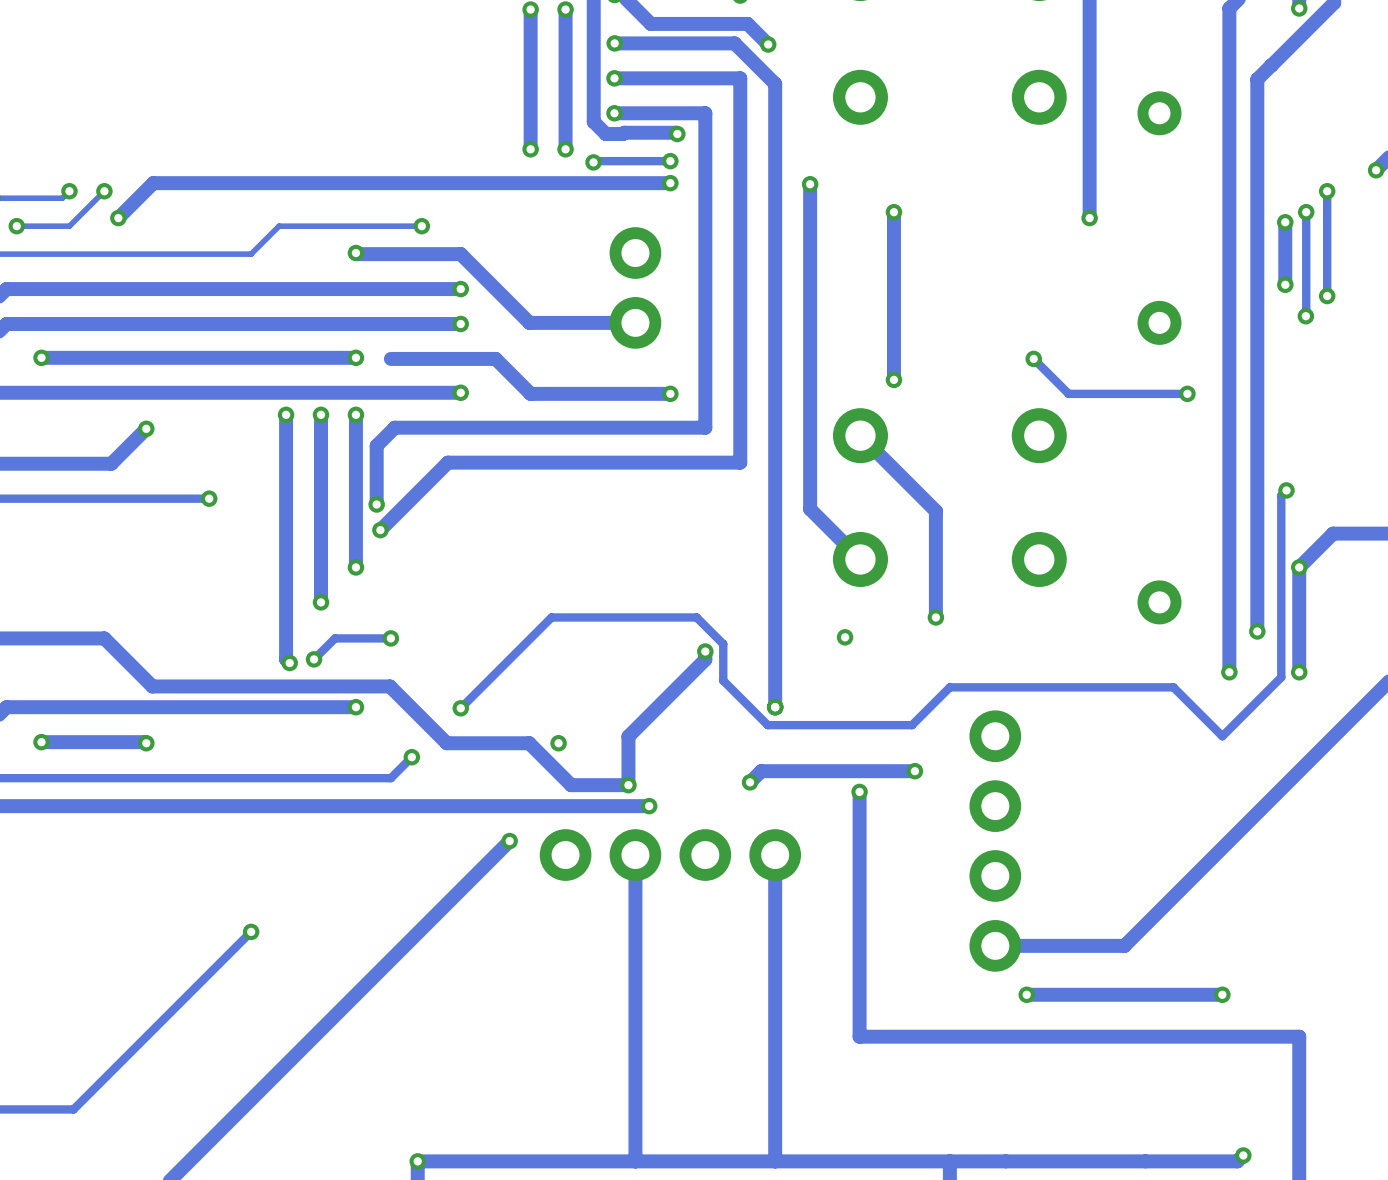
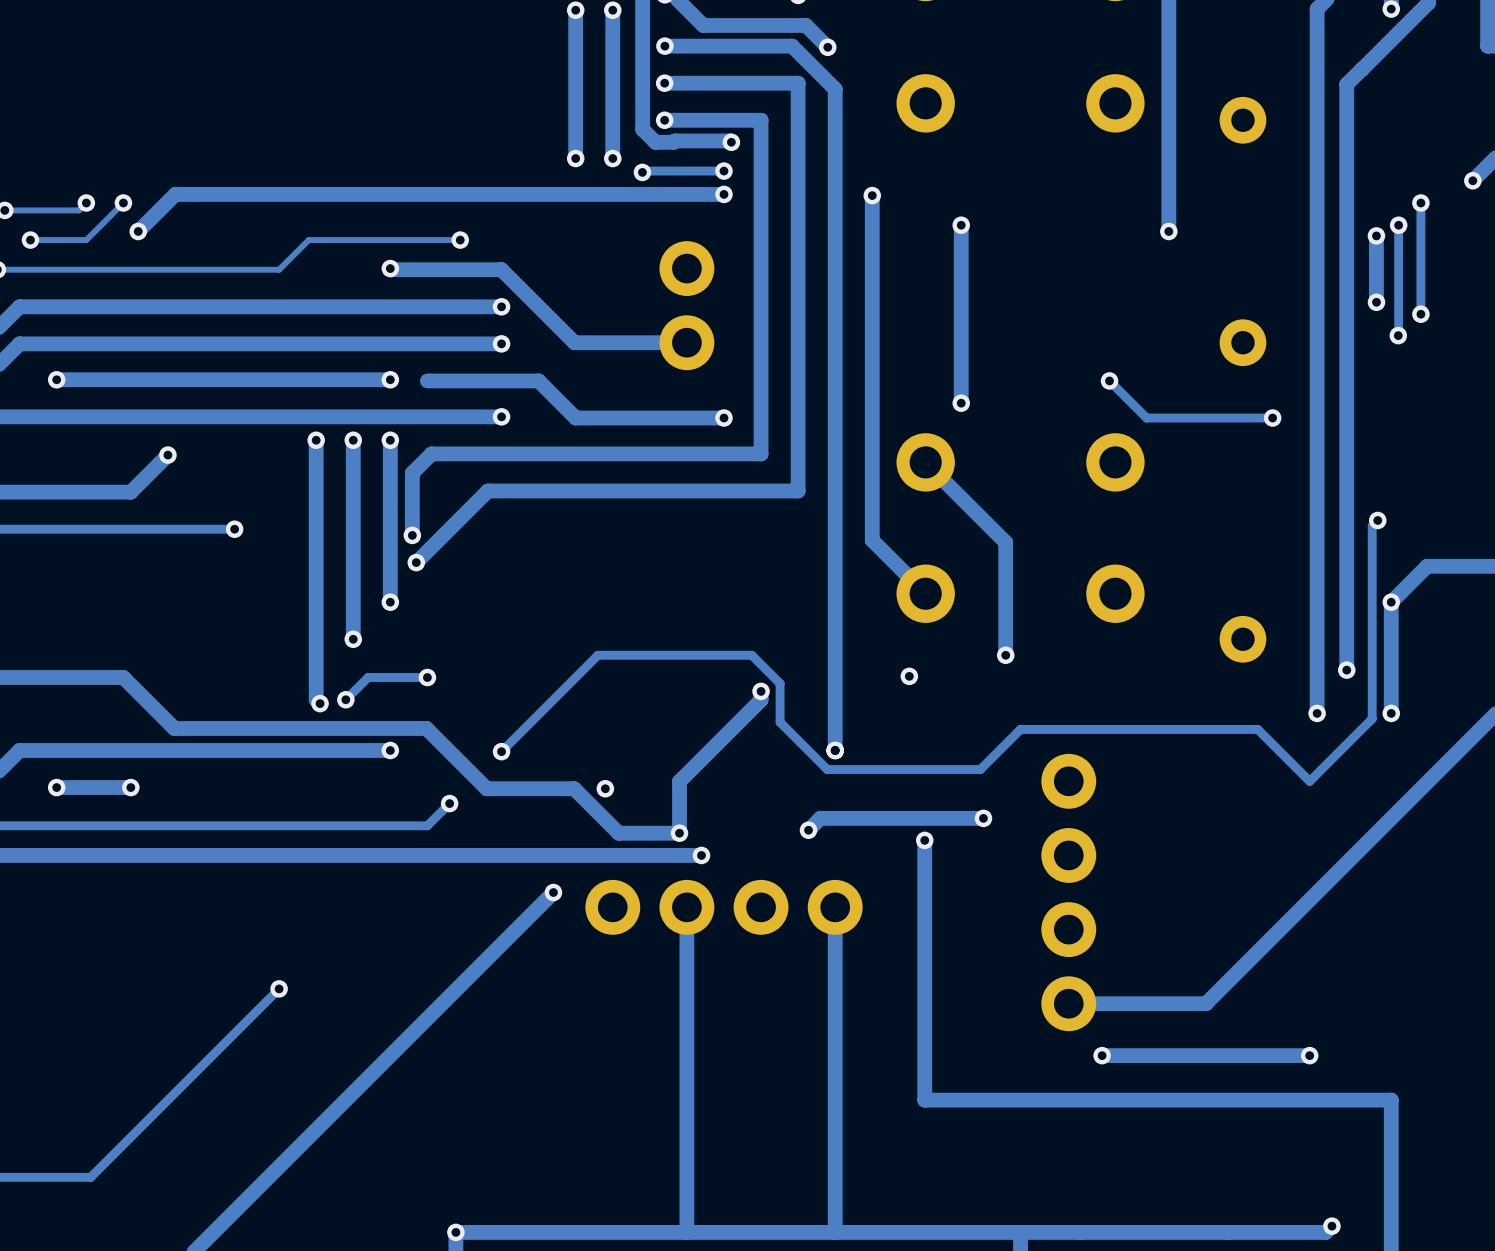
track: (111, 742) (146, 743) -> none
via position: (146, 743) -> (130, 787)

